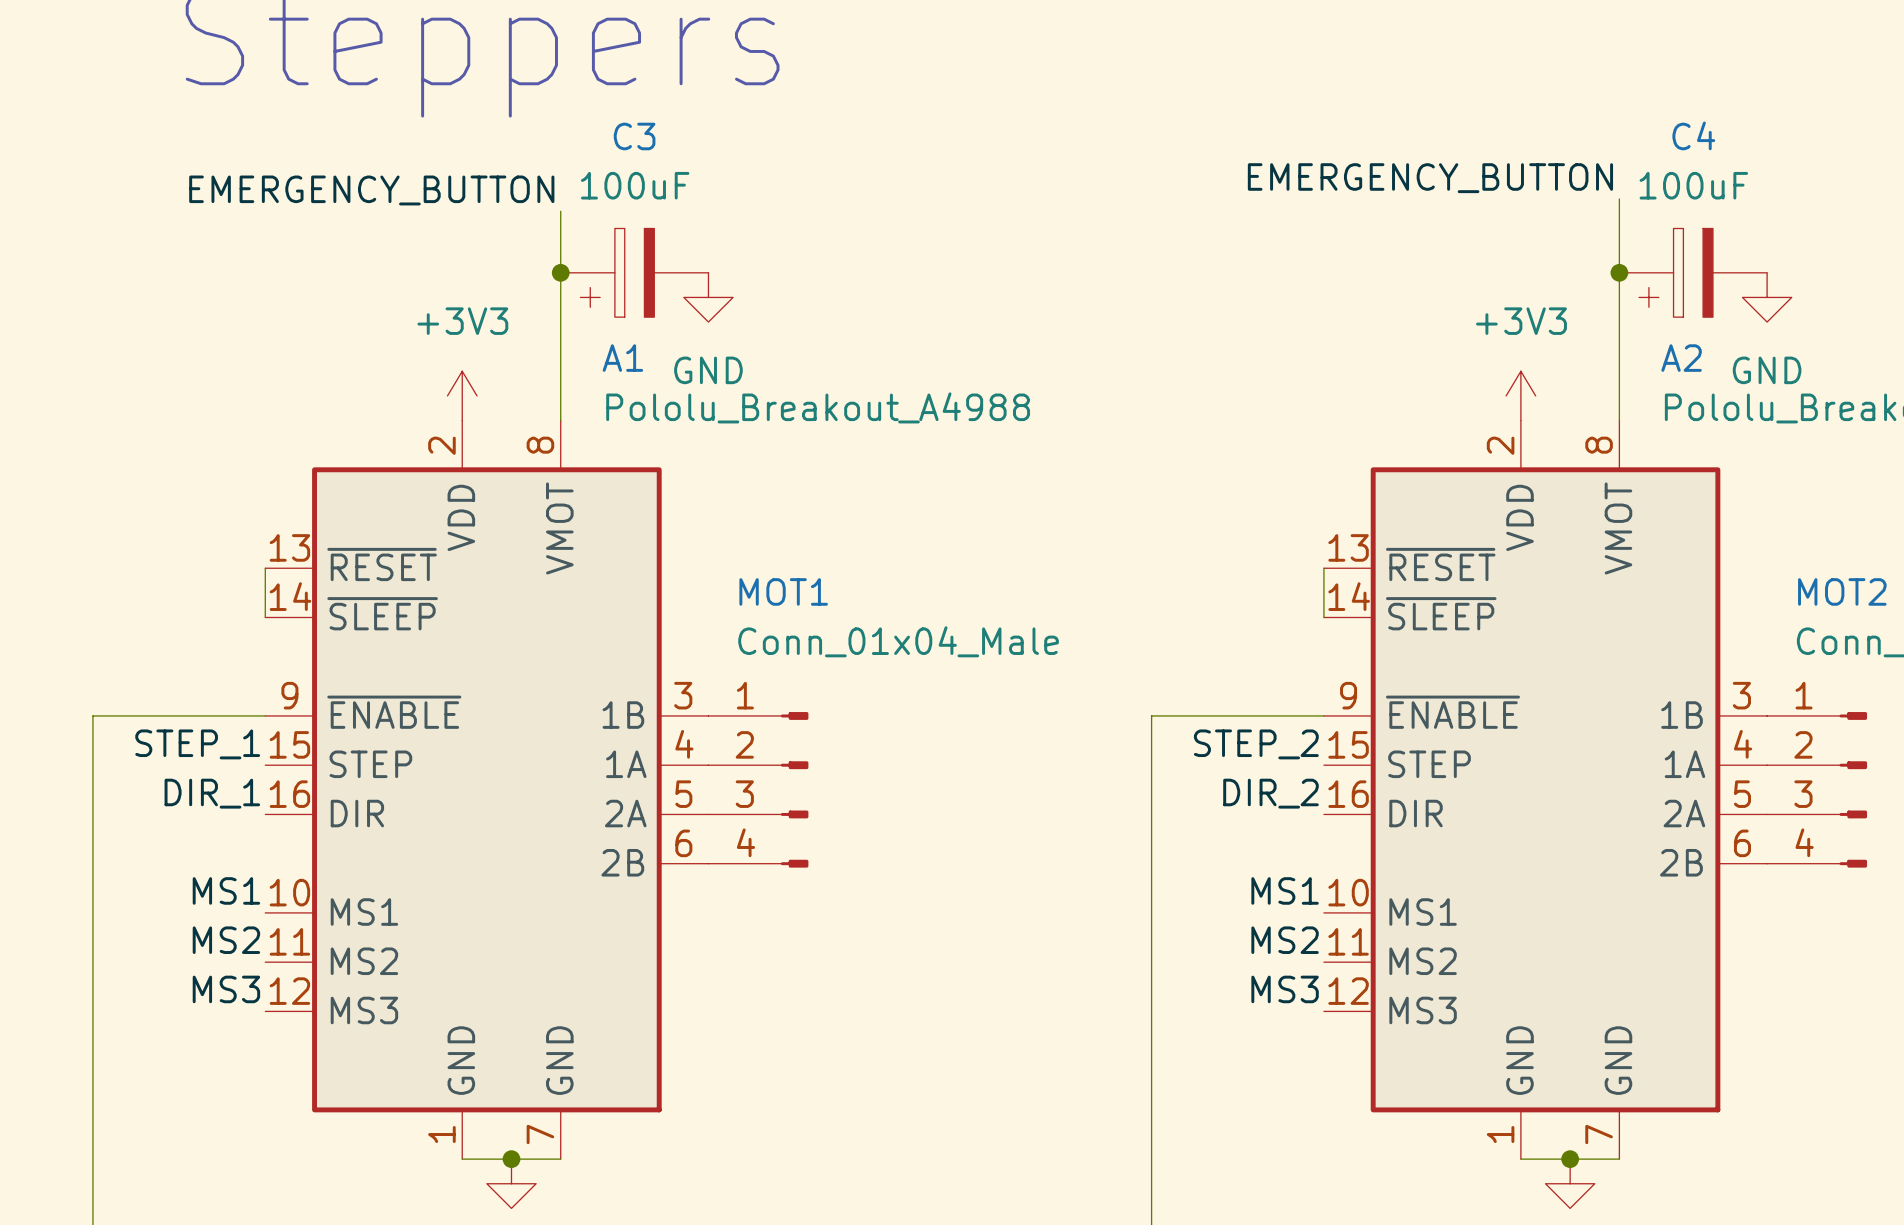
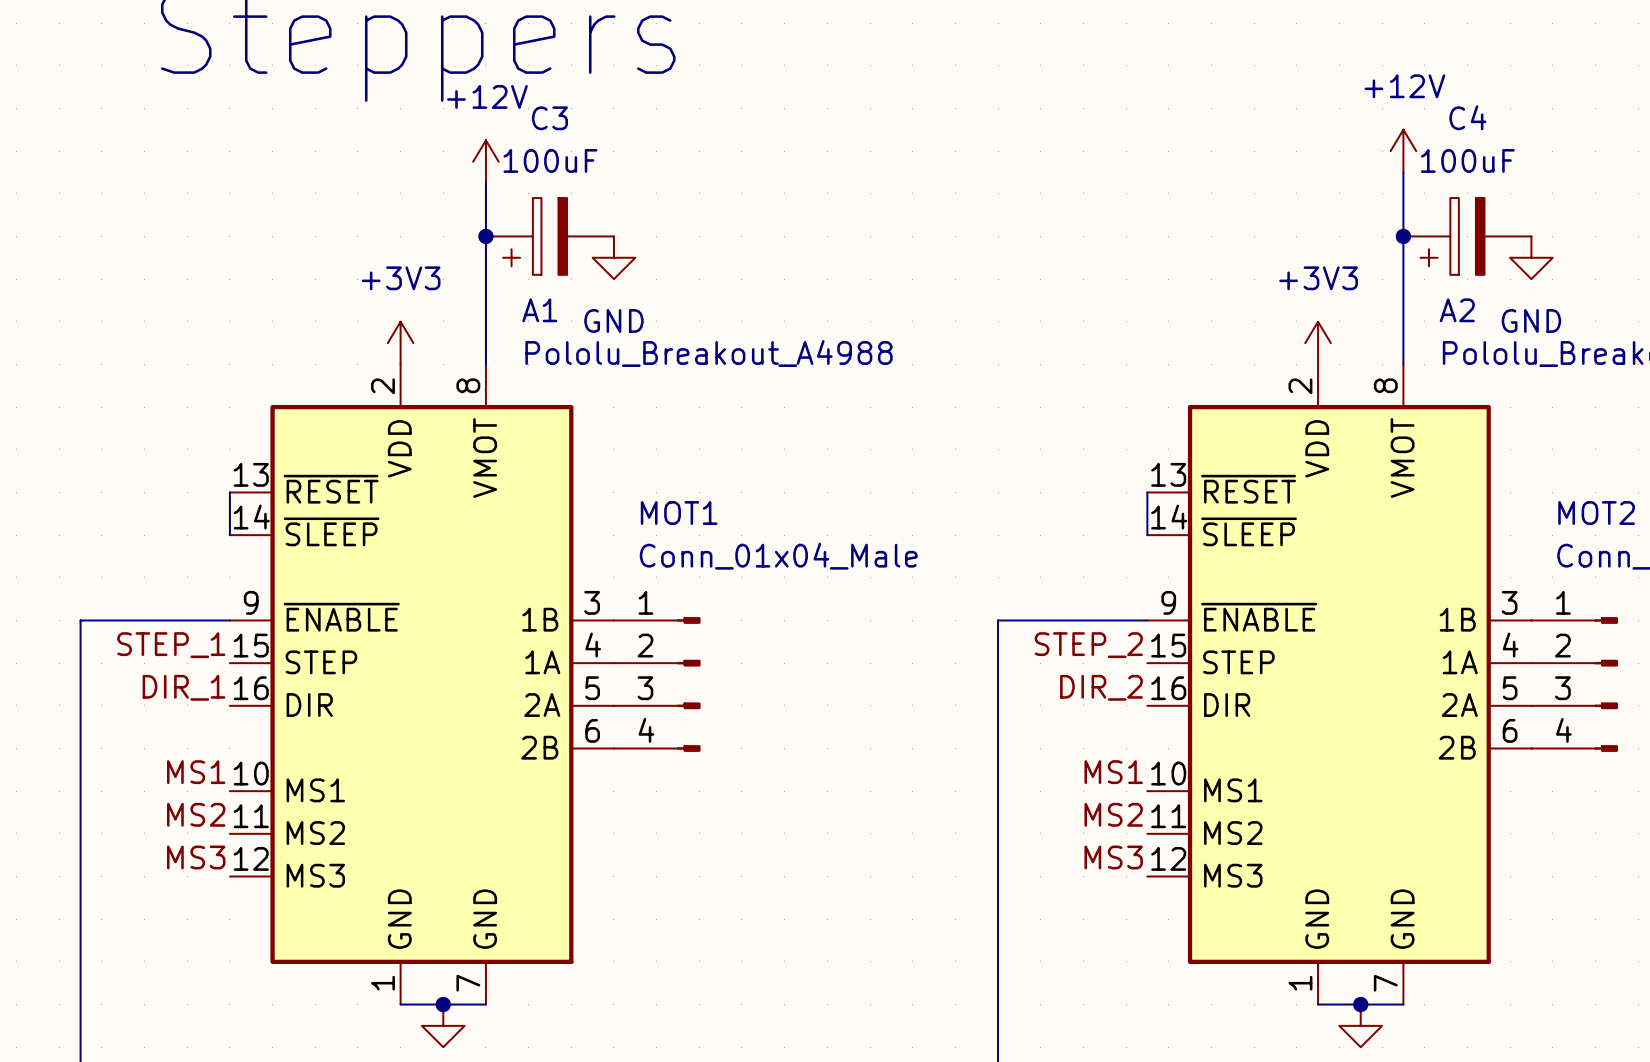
power symbol: none -> +12V (1403, 151)
label: EMERGENCY_BUTTON (1430, 178) -> none
power symbol: none -> +12V (485, 161)
label: EMERGENCY_BUTTON (371, 190) -> none

